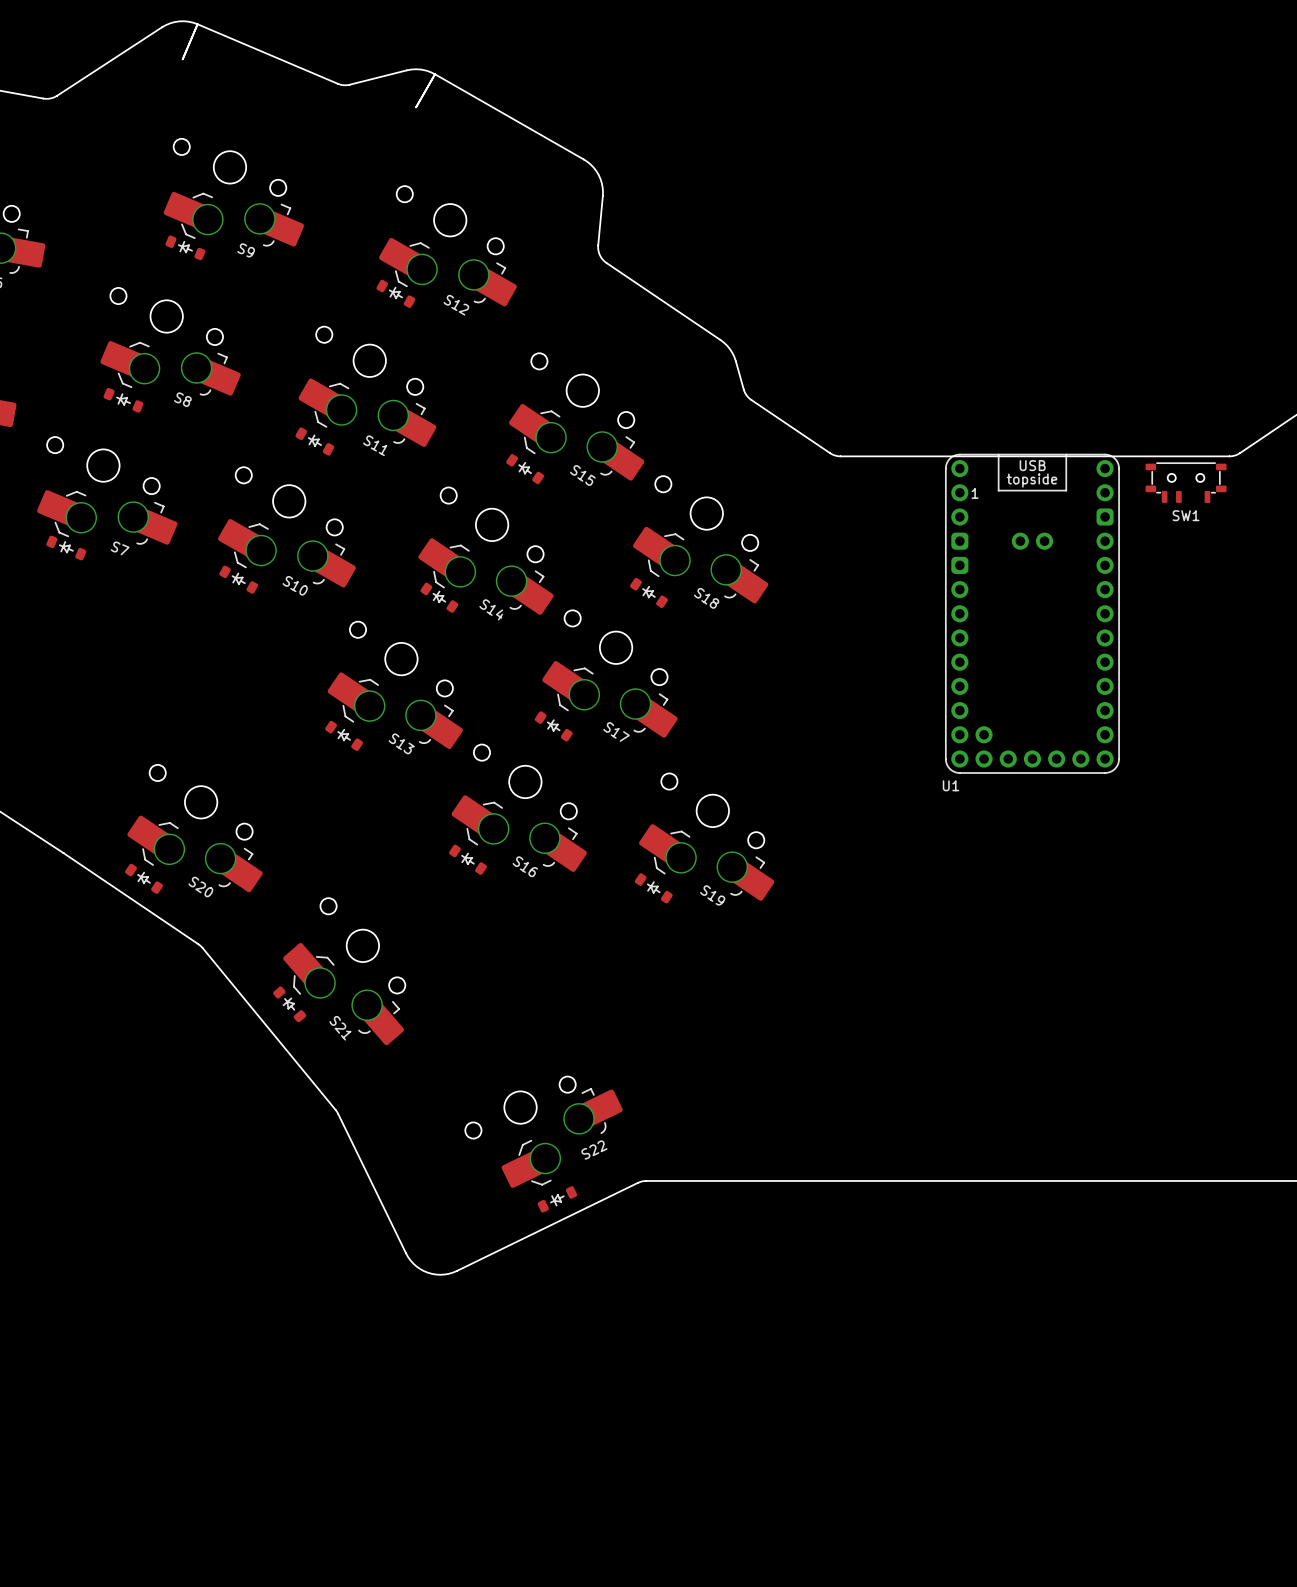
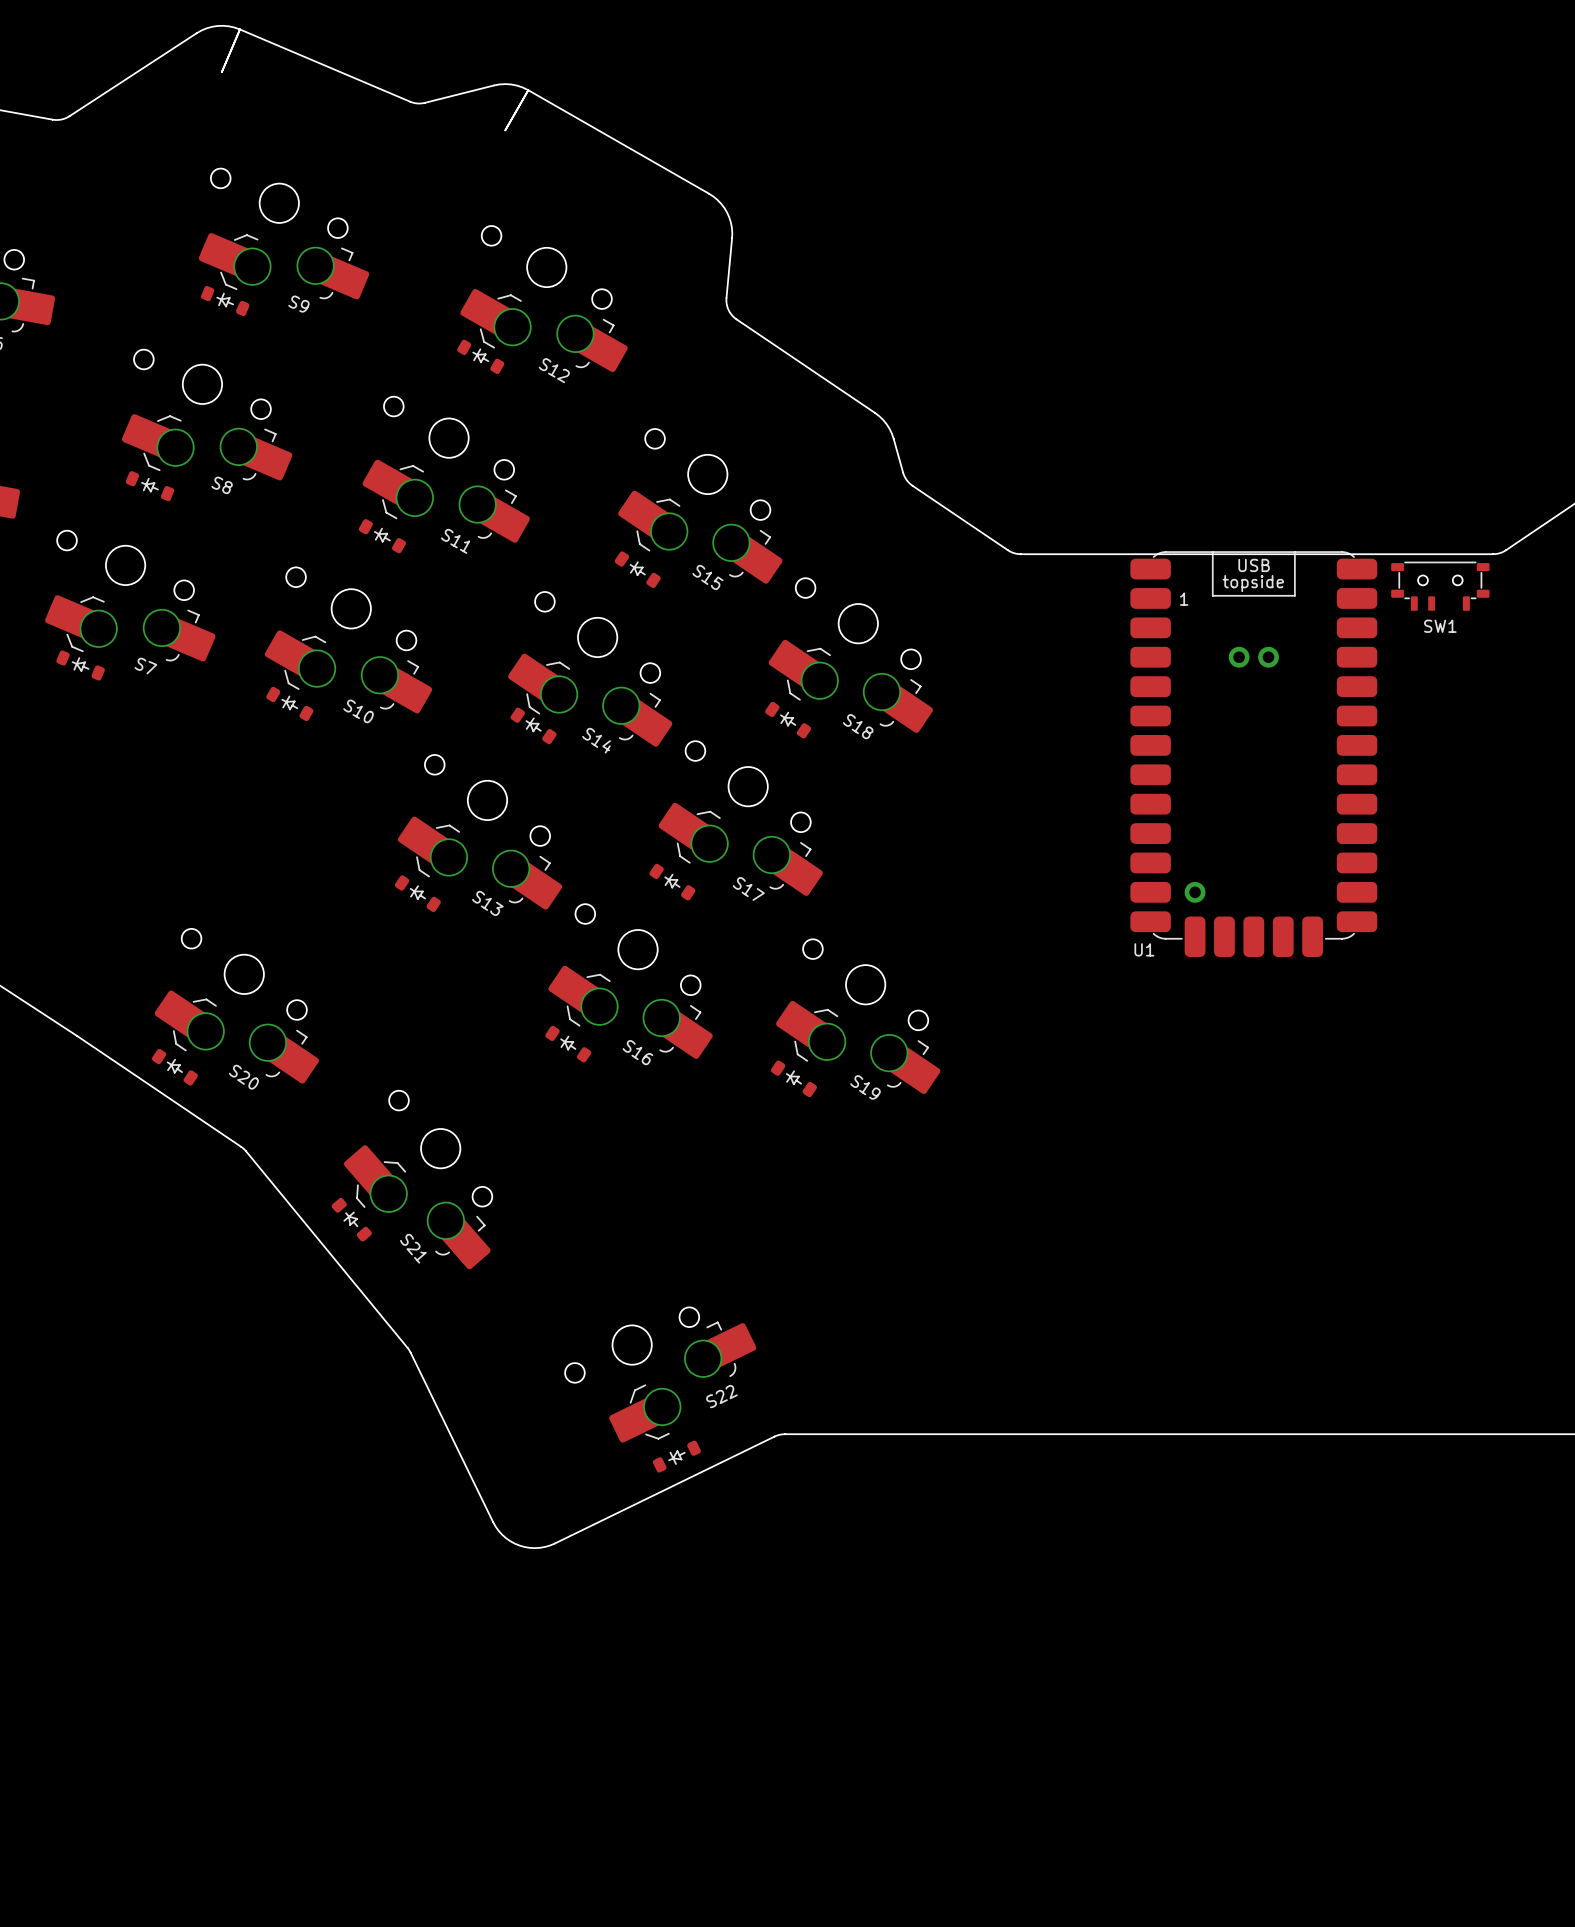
U1 footprint: [945, 453, 1120, 774] -> [1130, 551, 1378, 958]

